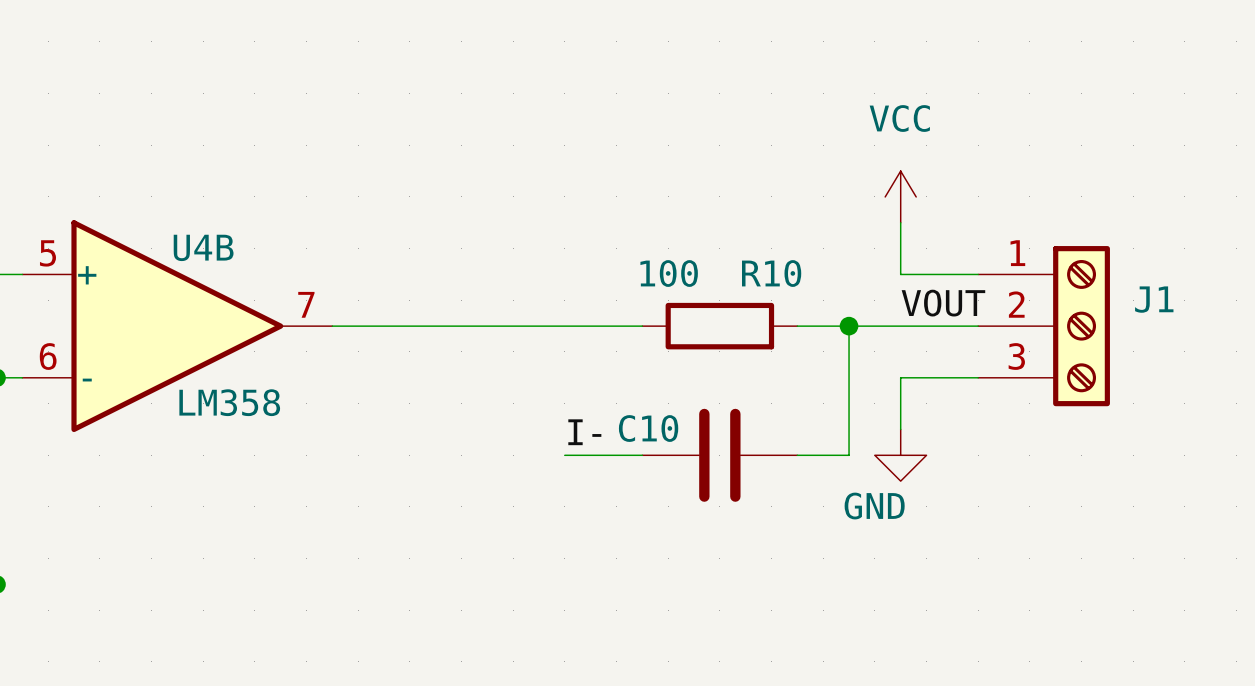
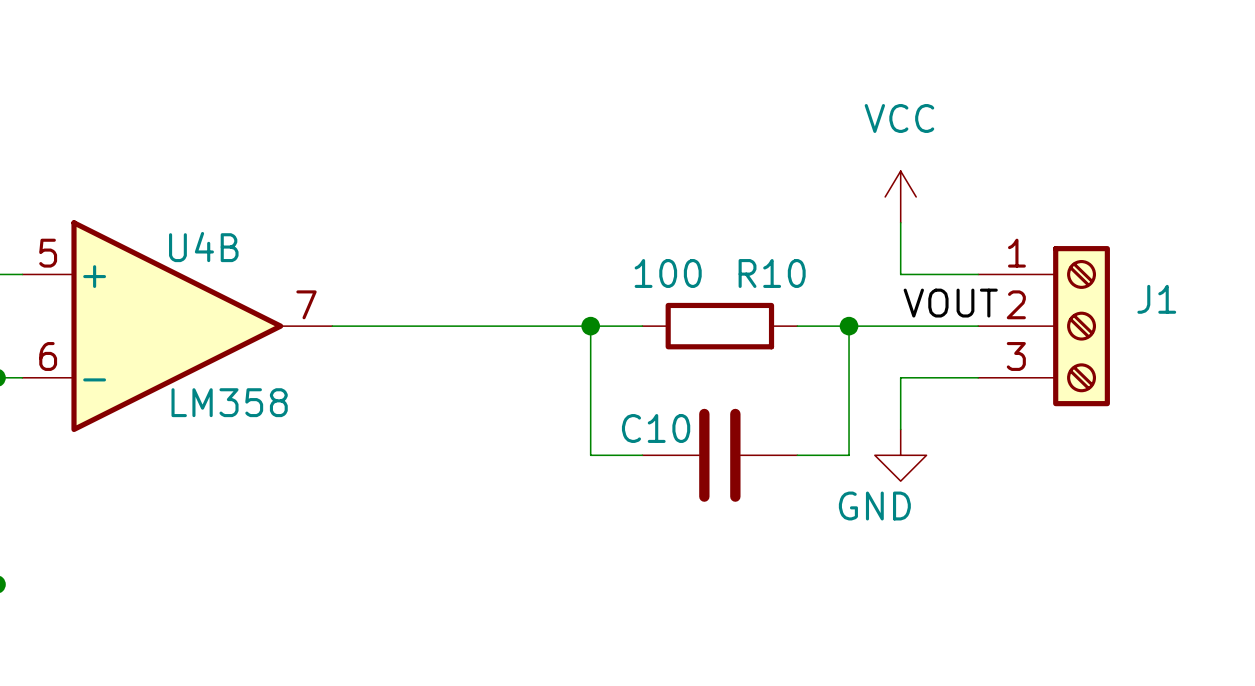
junction: none -> (590, 326)
label: I- (584, 432) -> none
wire: (564, 455) (590, 455) -> (590, 326) (590, 455)

